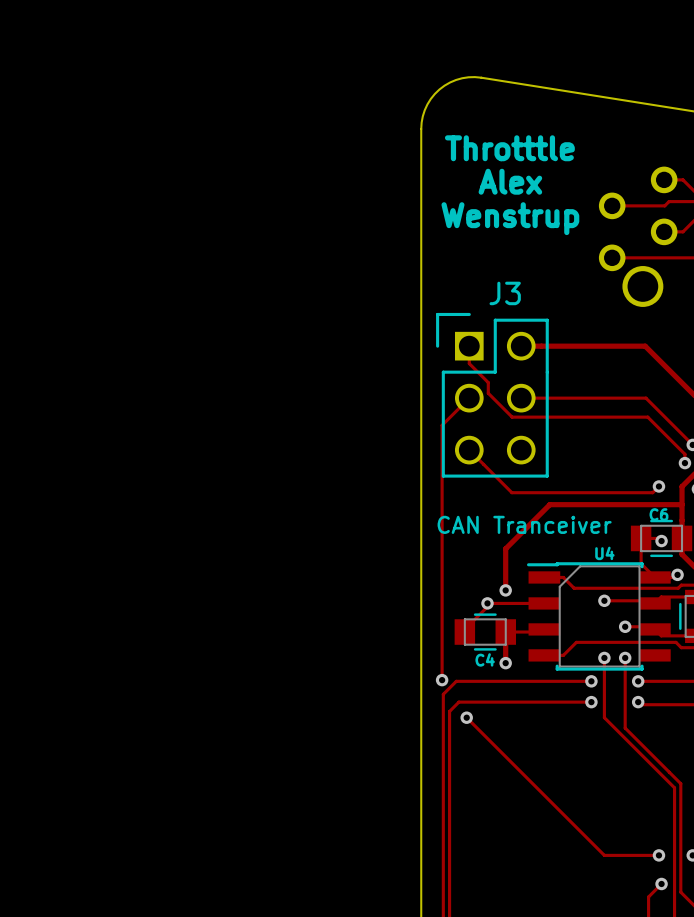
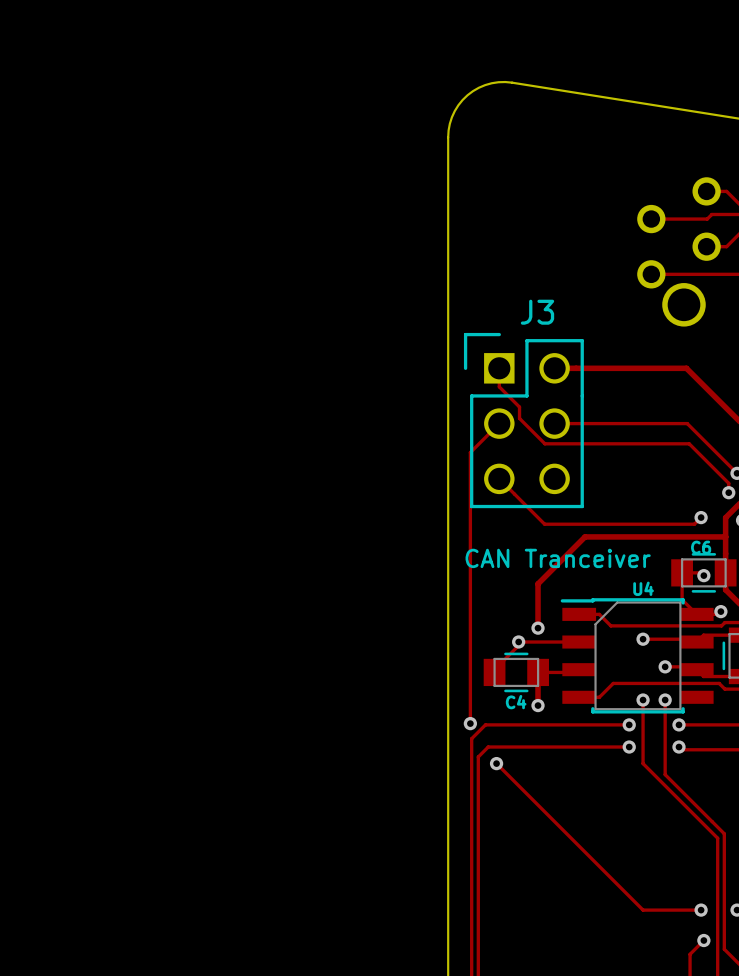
text: Throtttle (509, 148) -> none
text: Alex (510, 181) -> none
text: Wenstrup (510, 218) -> none

